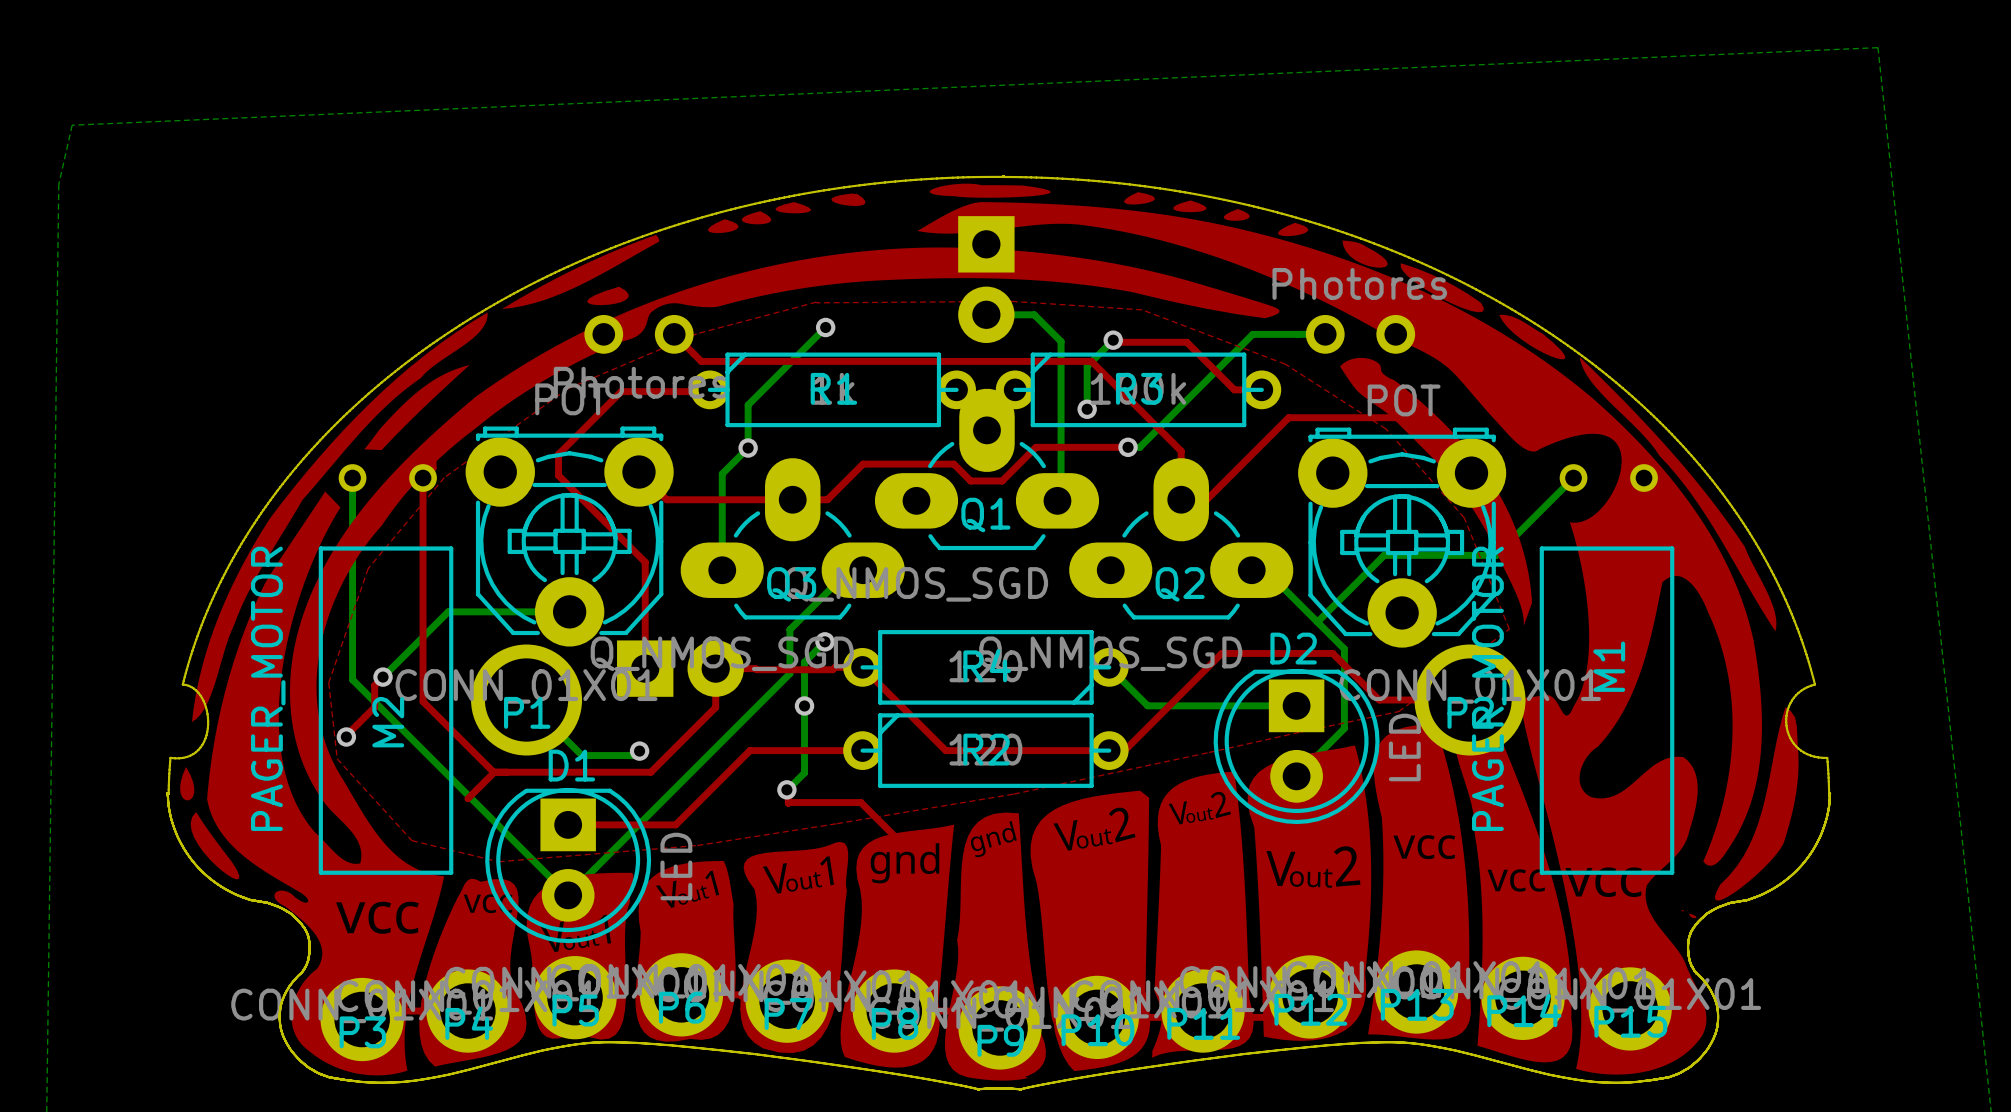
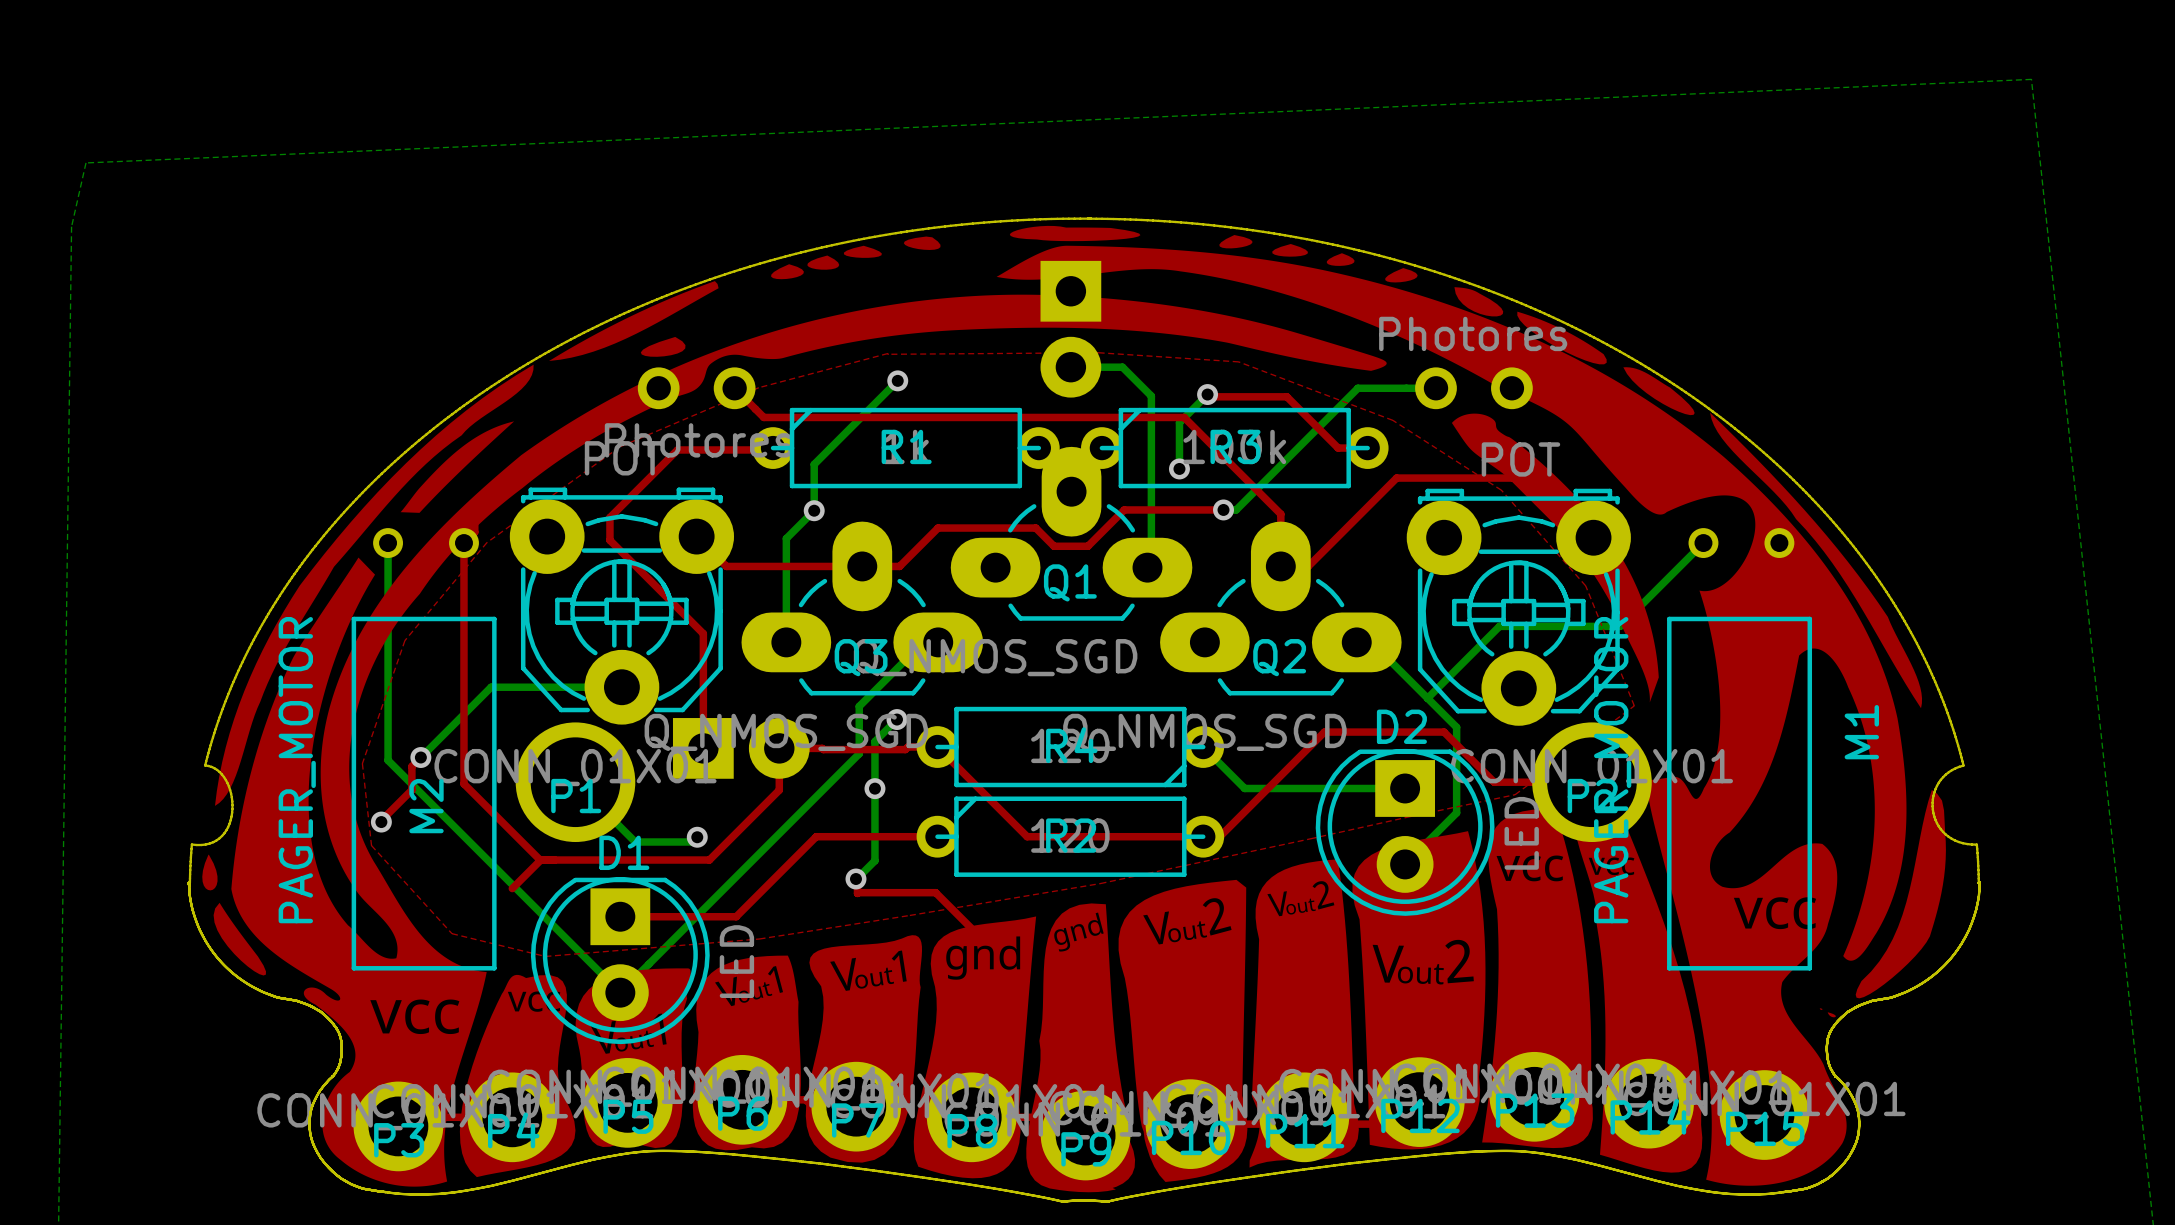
drawing shape: [166, 175, 1832, 1091] -> [187, 217, 1981, 1203]
M1 name position: M1 (1609, 666) -> M1 (1861, 732)

